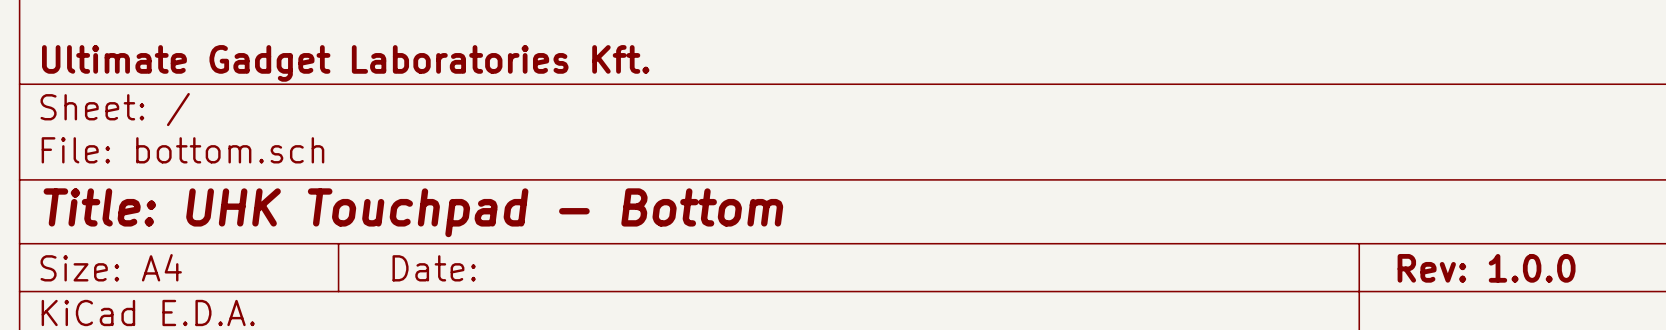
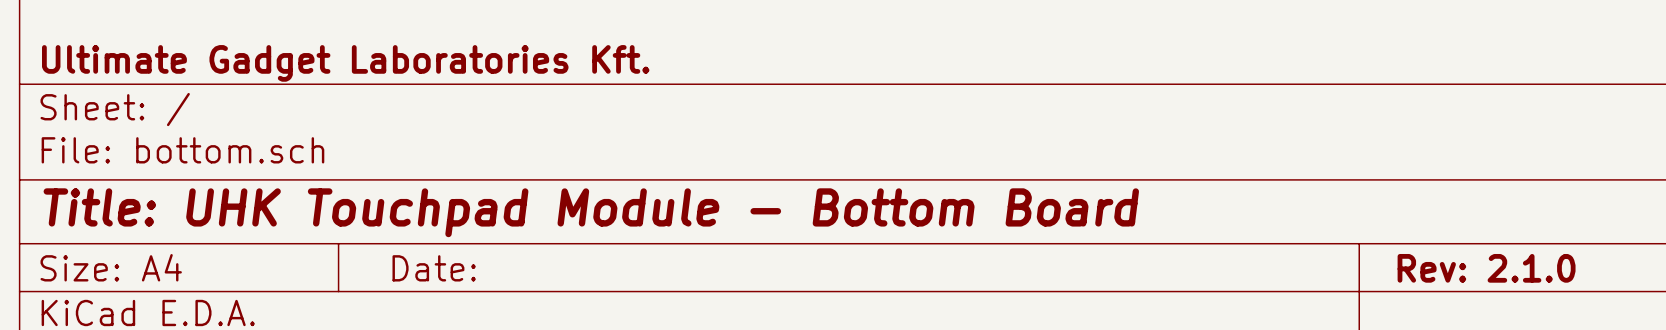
title block: Title: UHK Touchpad - Bottom (413, 212) -> Title: UHK Touchpad Module - Bottom Board (591, 212)
title block: Rev: 1.0.0 (1486, 268) -> Rev: 2.1.0 (1486, 268)

